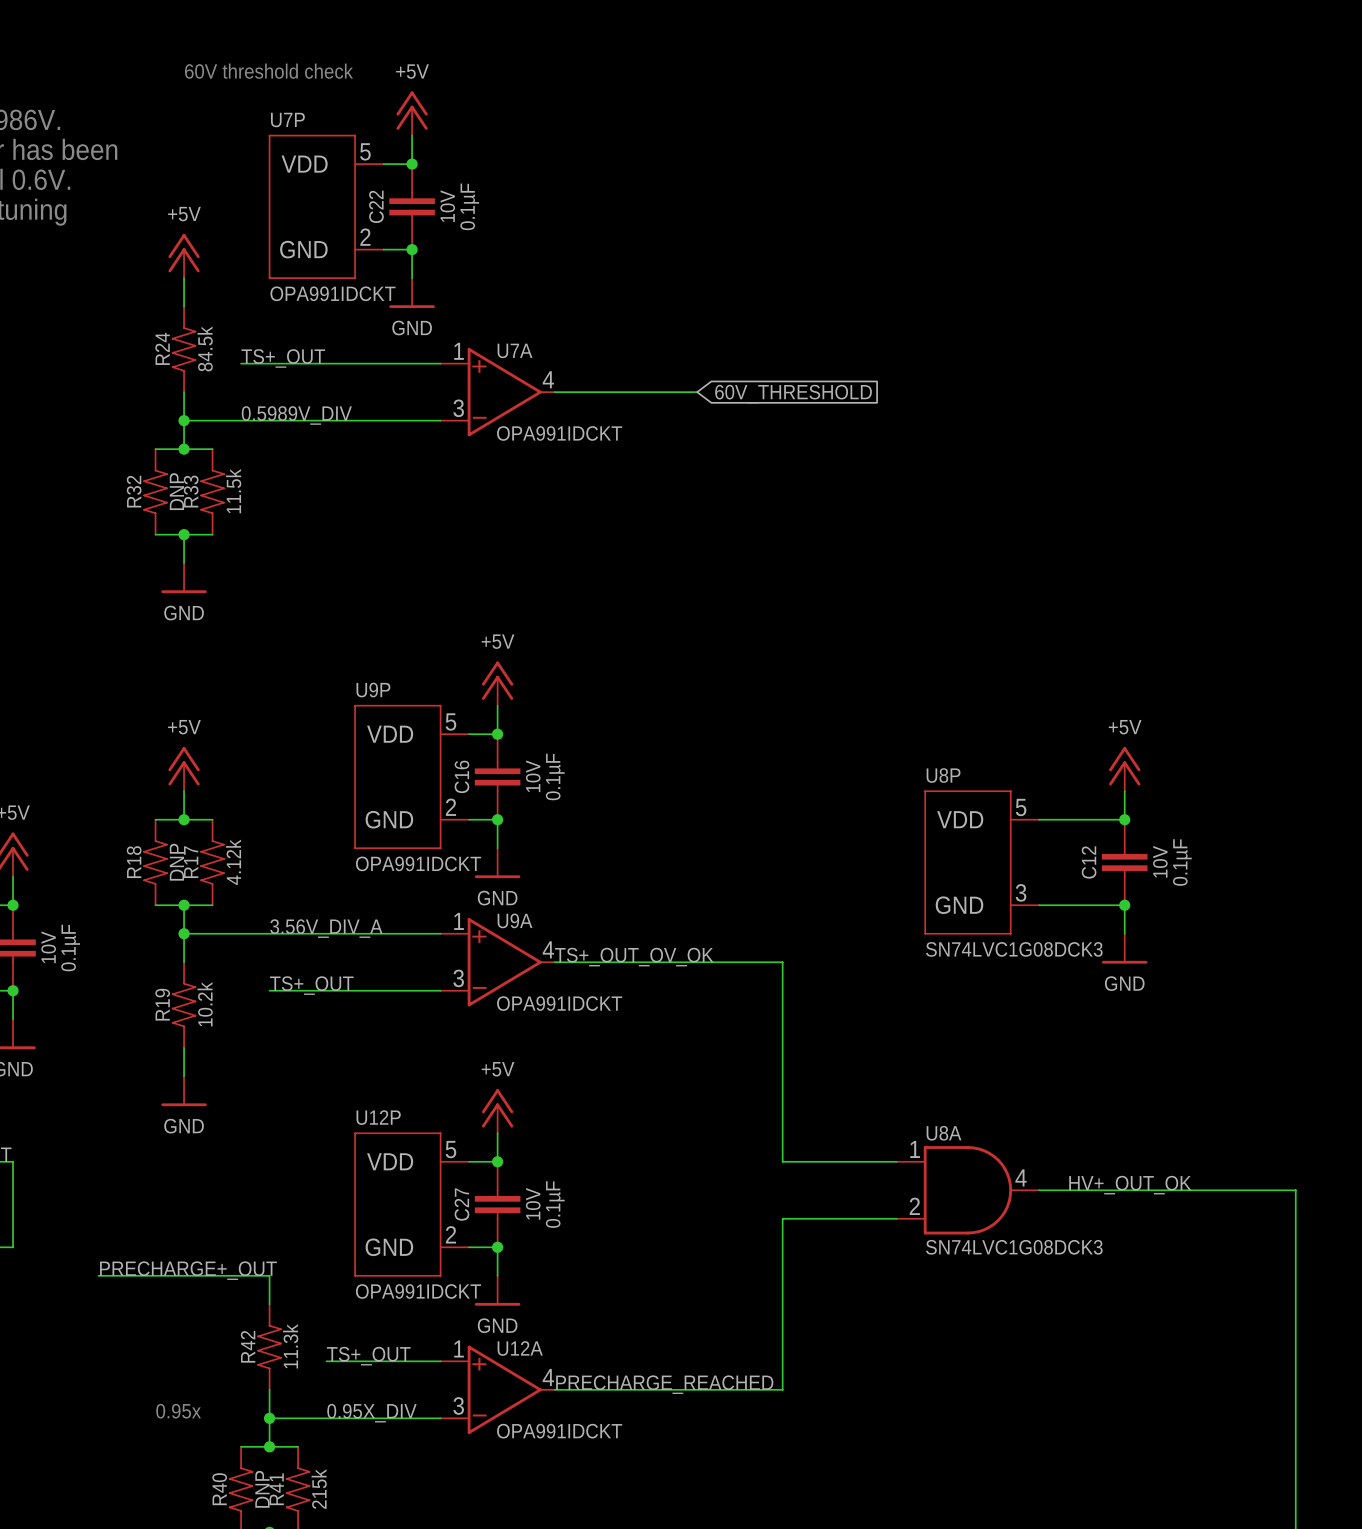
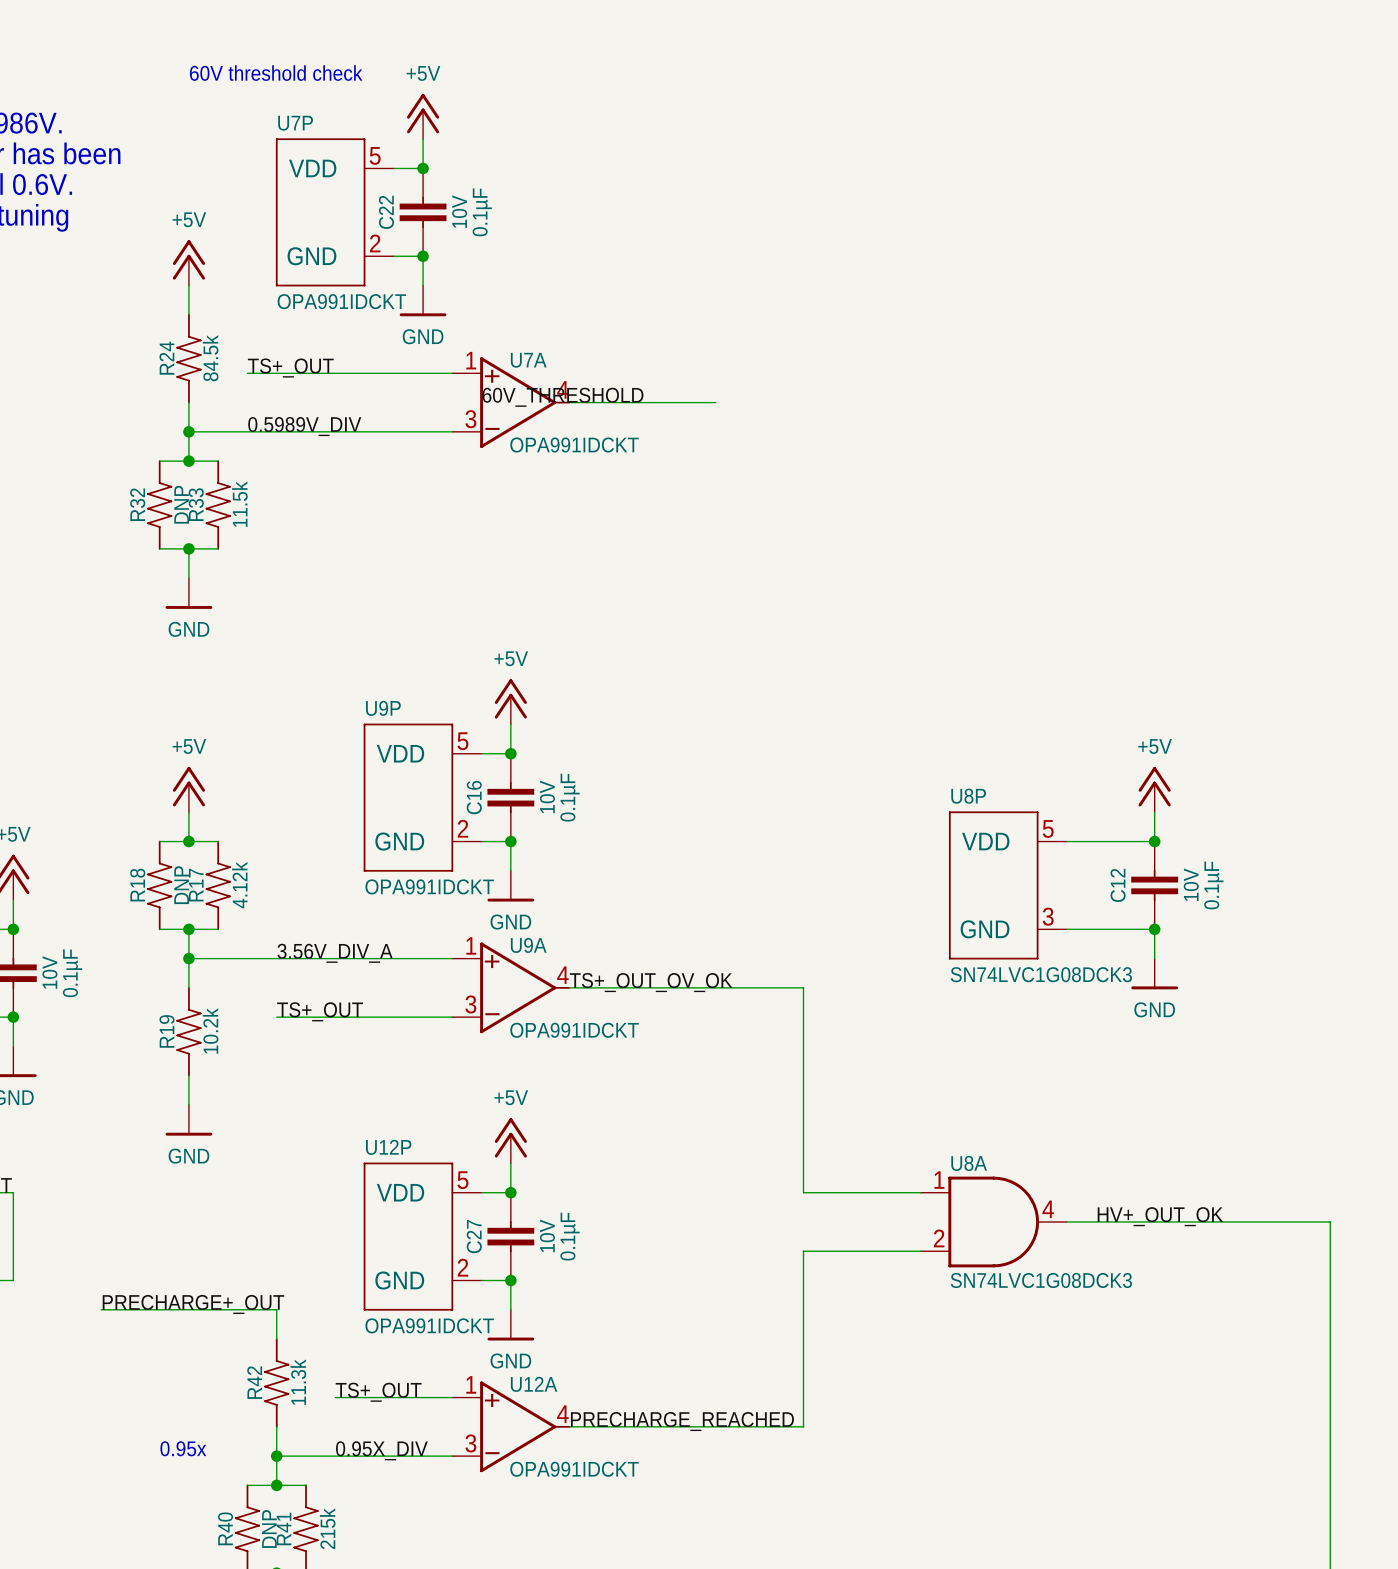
label: none -> 60V_THRESHOLD (563, 397)
global label: 60V_THRESHOLD (793, 394) -> none

